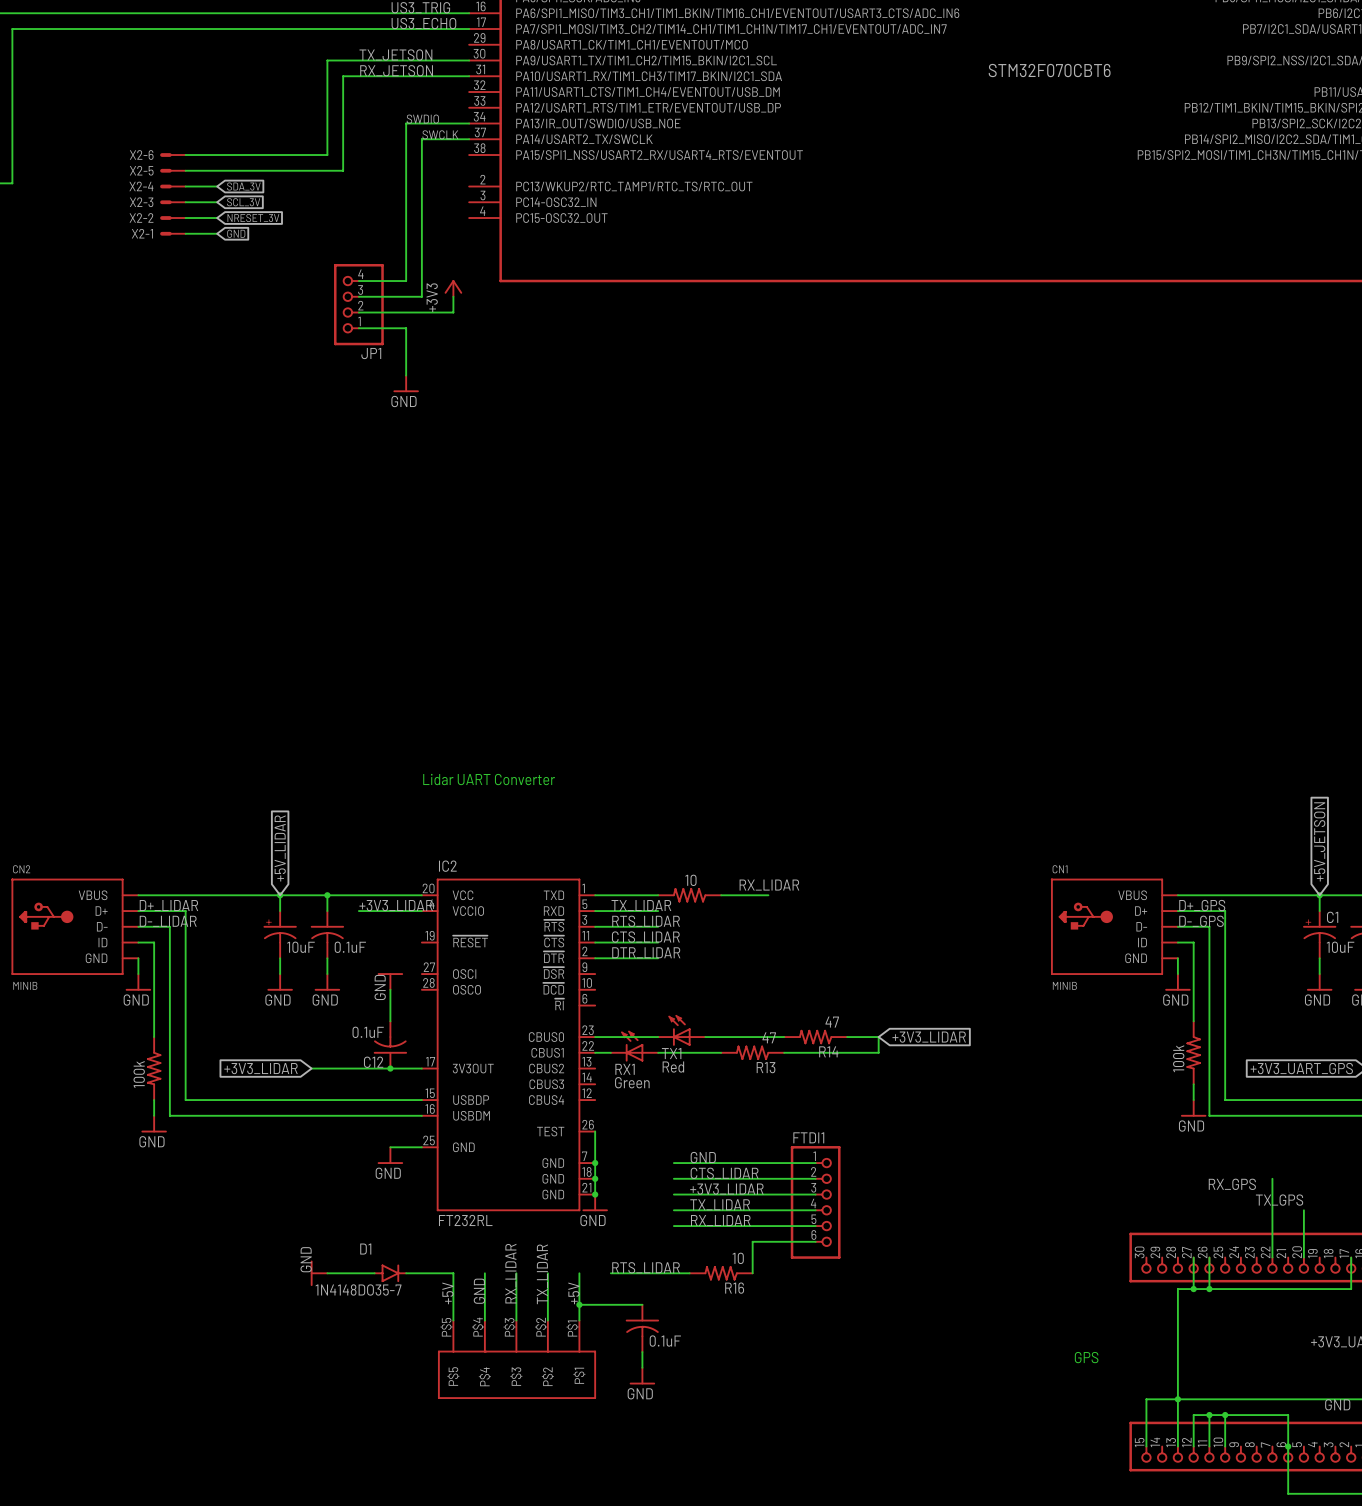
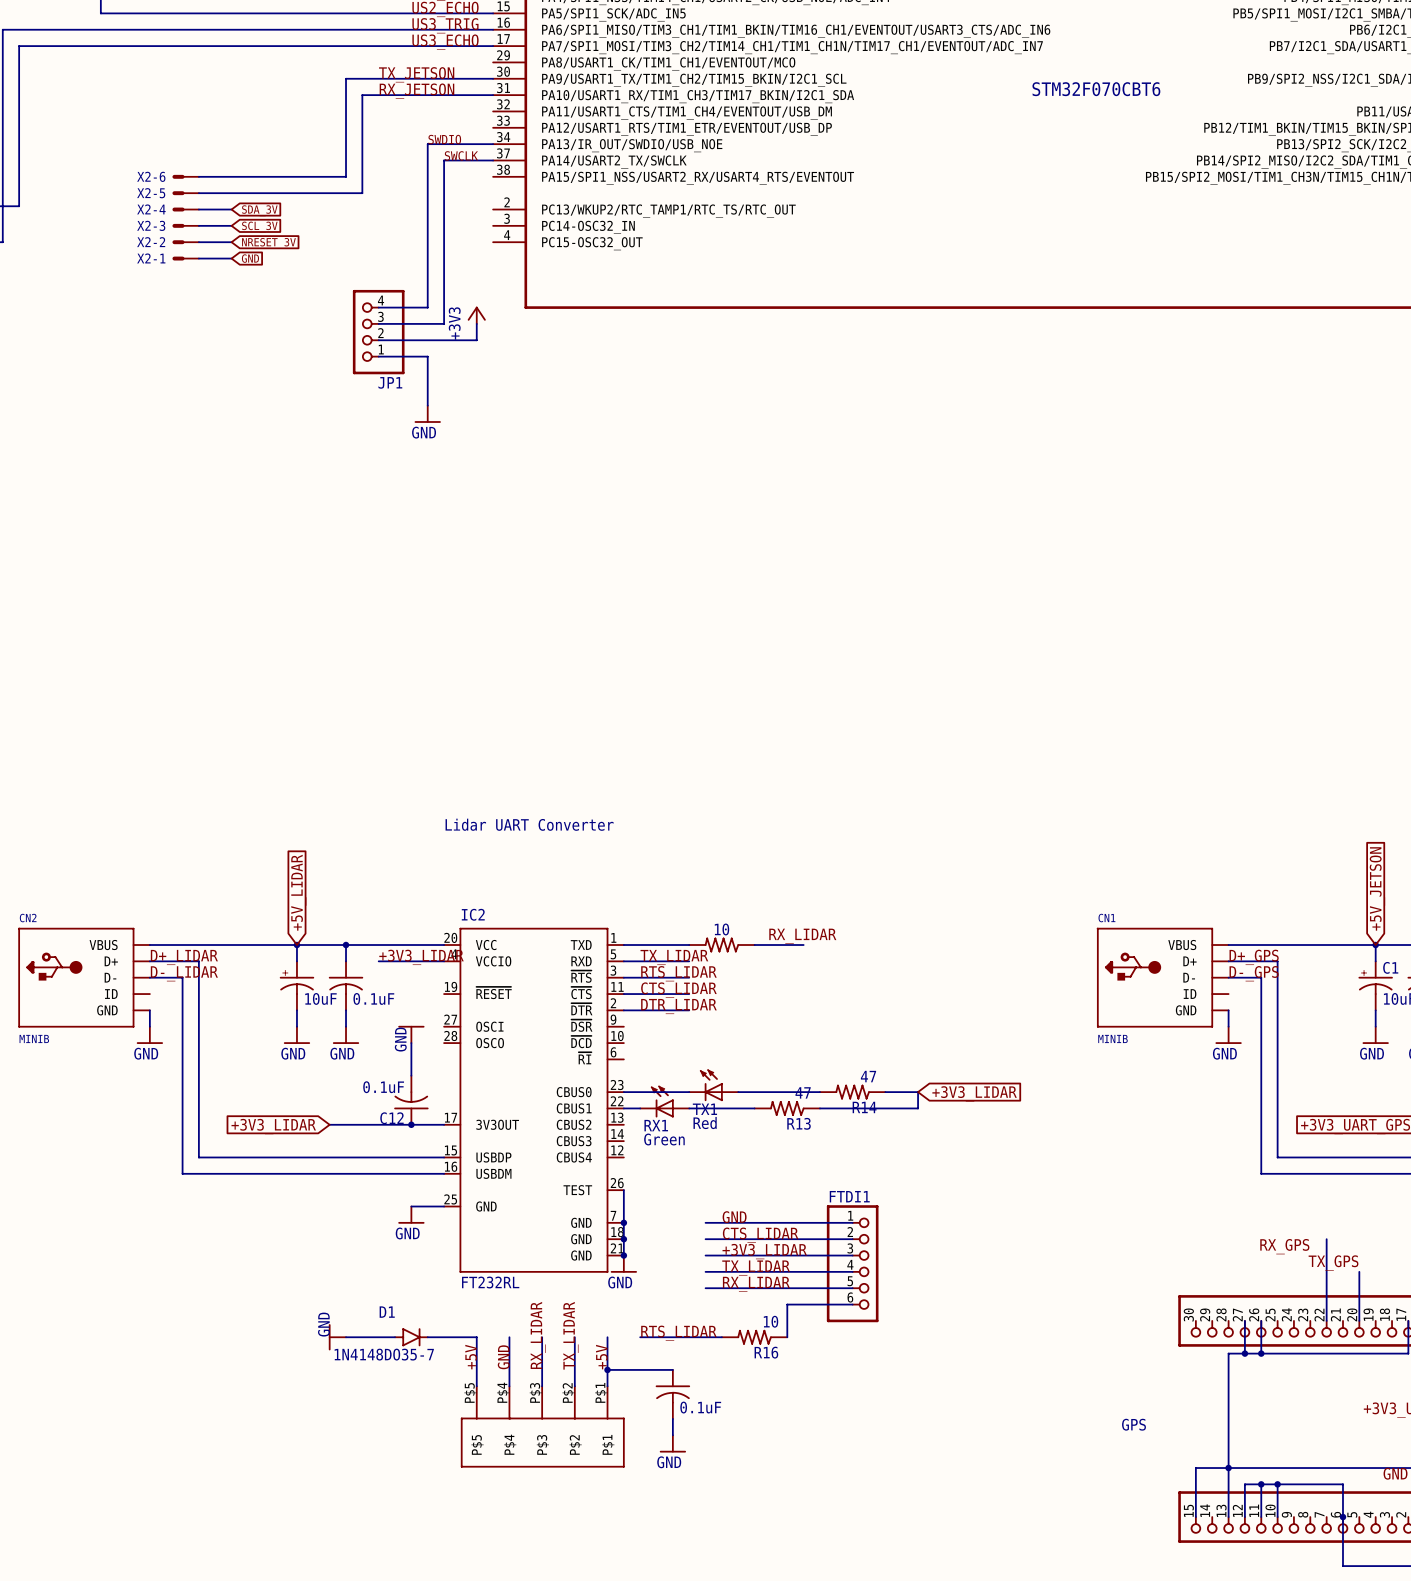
wire: (138, 942) (154, 942) (154, 1037) -> none
wire: (1177, 942) (1193, 942) (1193, 1021) -> none
part: 100k (1193, 1052) -> none
part: 100k (154, 1068) -> none
wire: (1193, 1084) (1193, 1100) -> none
wire: (154, 1100) (154, 1115) -> none
power symbol: GND (1193, 1108) -> none
power symbol: GND (154, 1124) -> none

